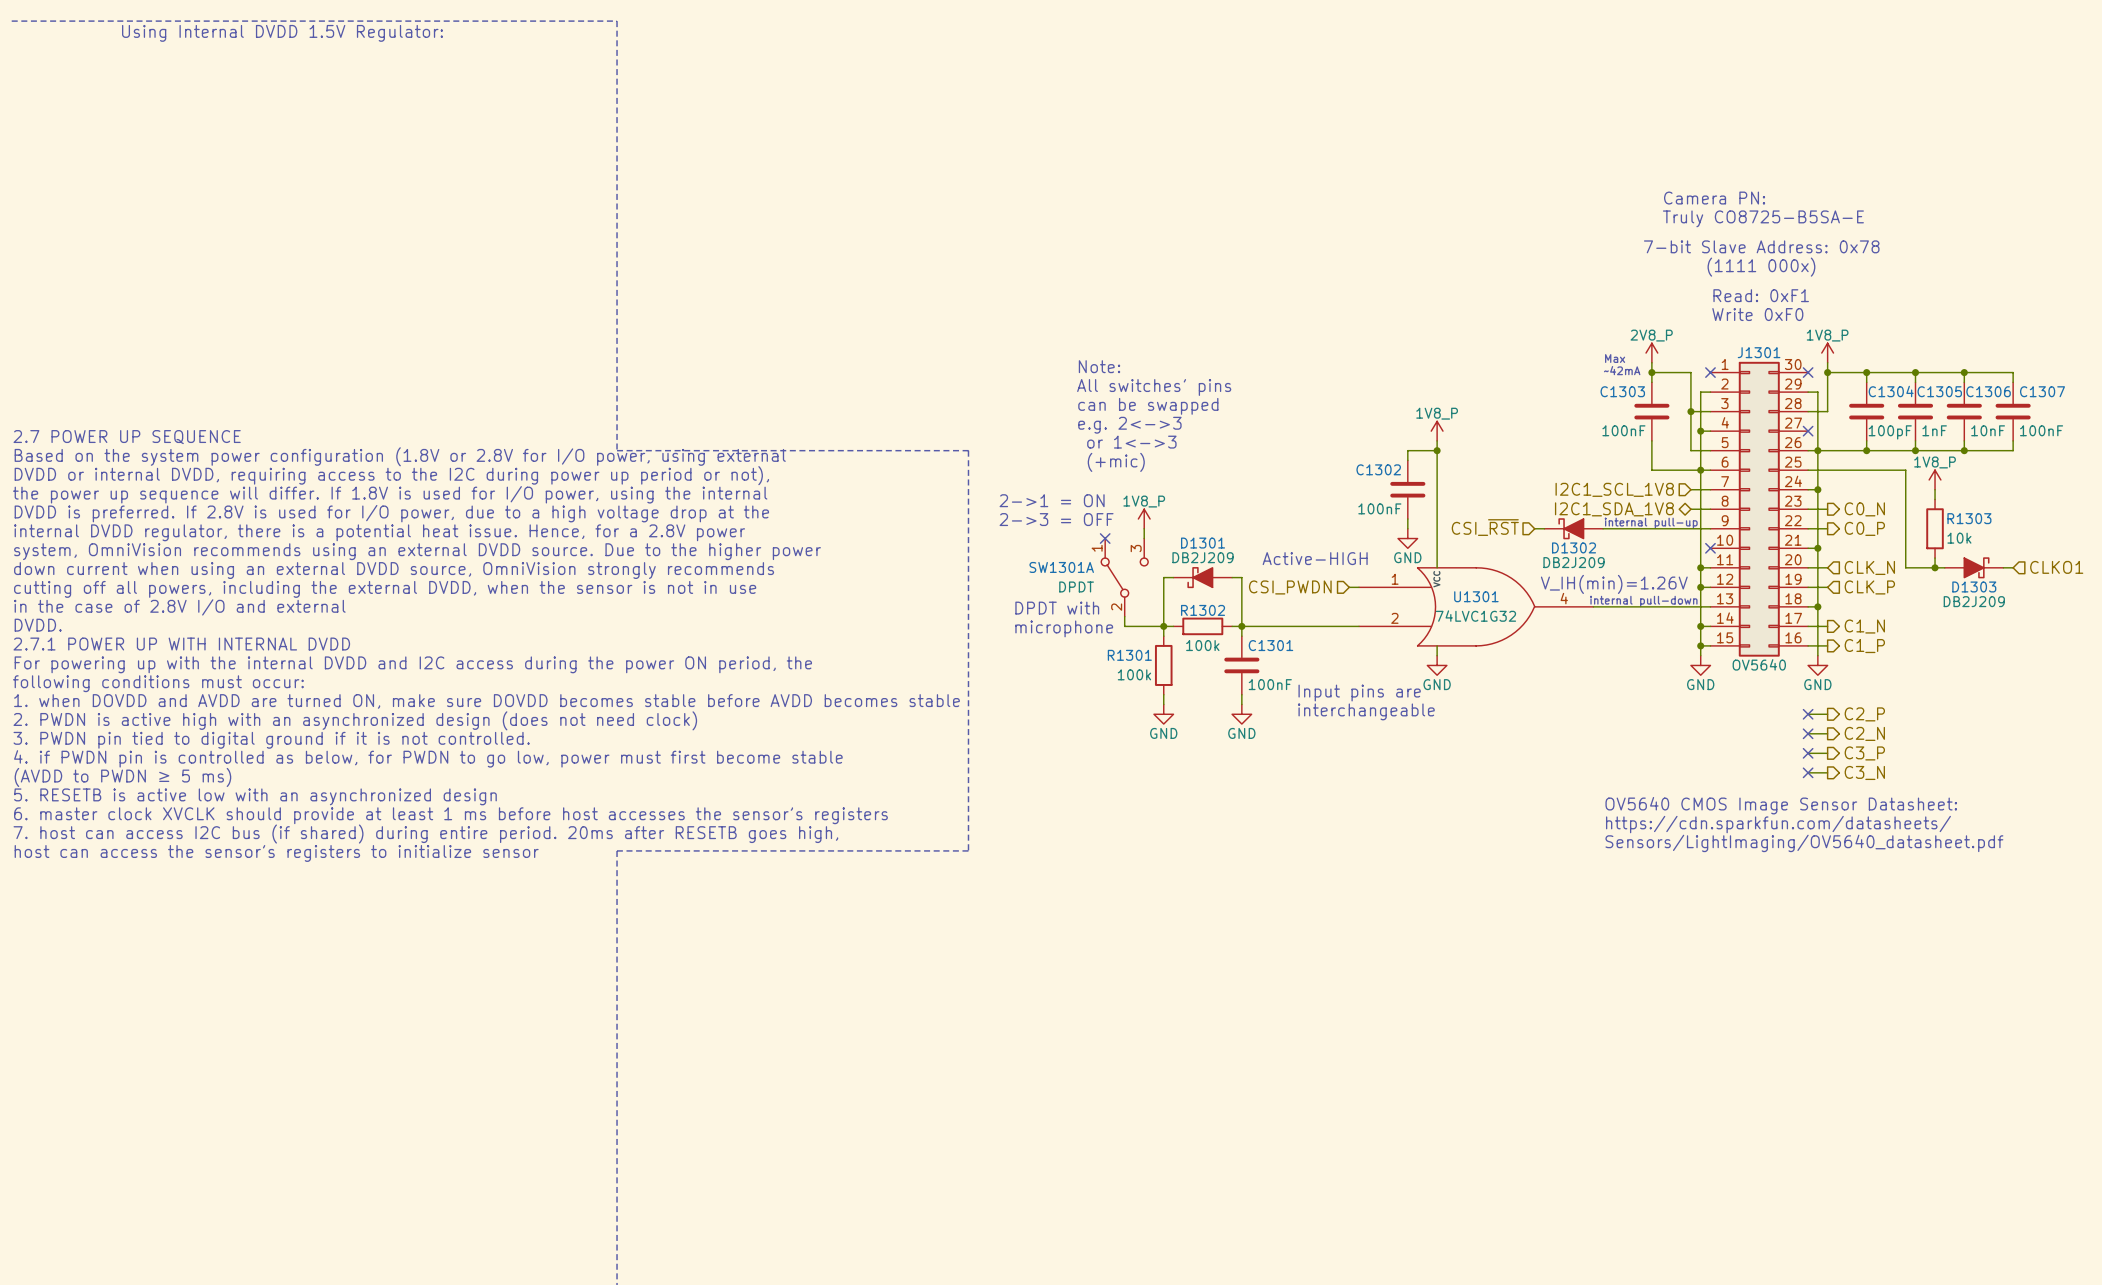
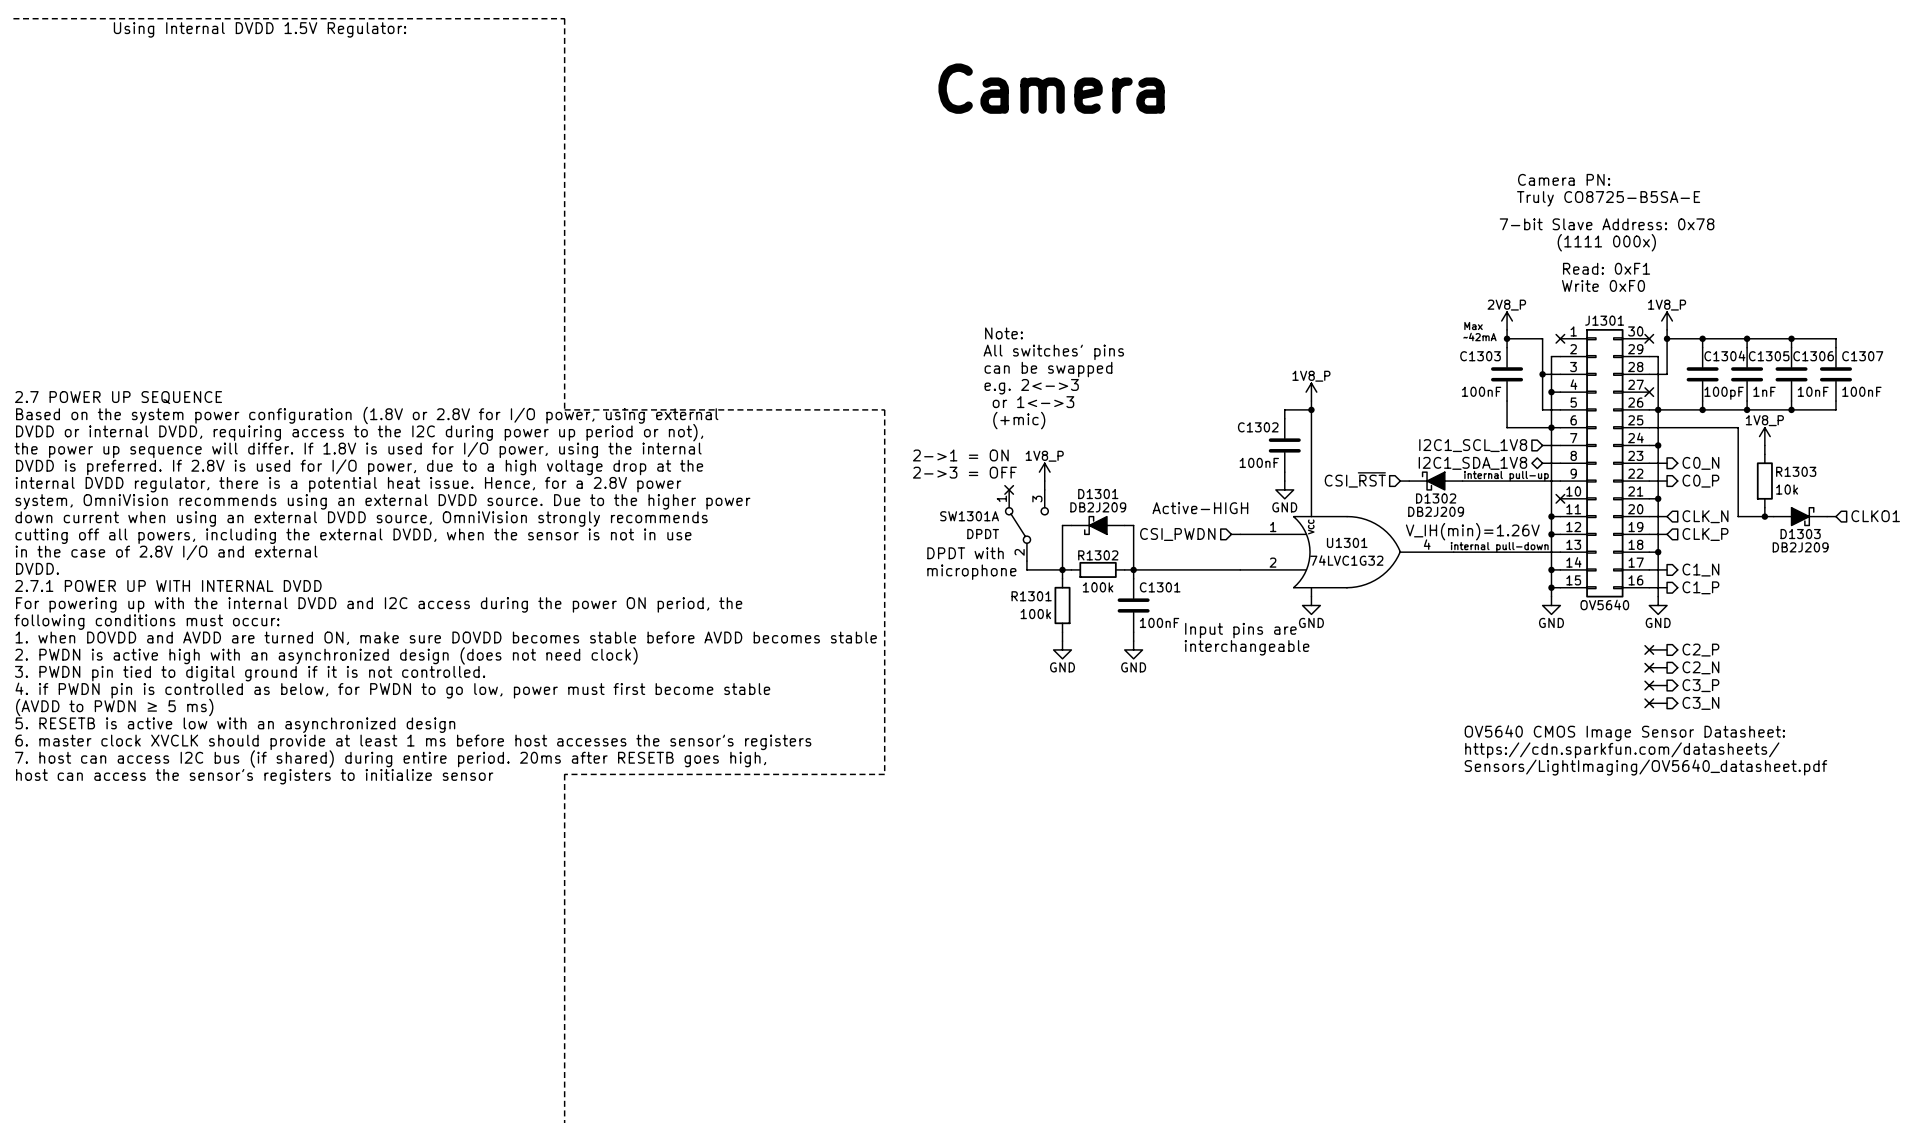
text: none -> Camera (1051, 88)

